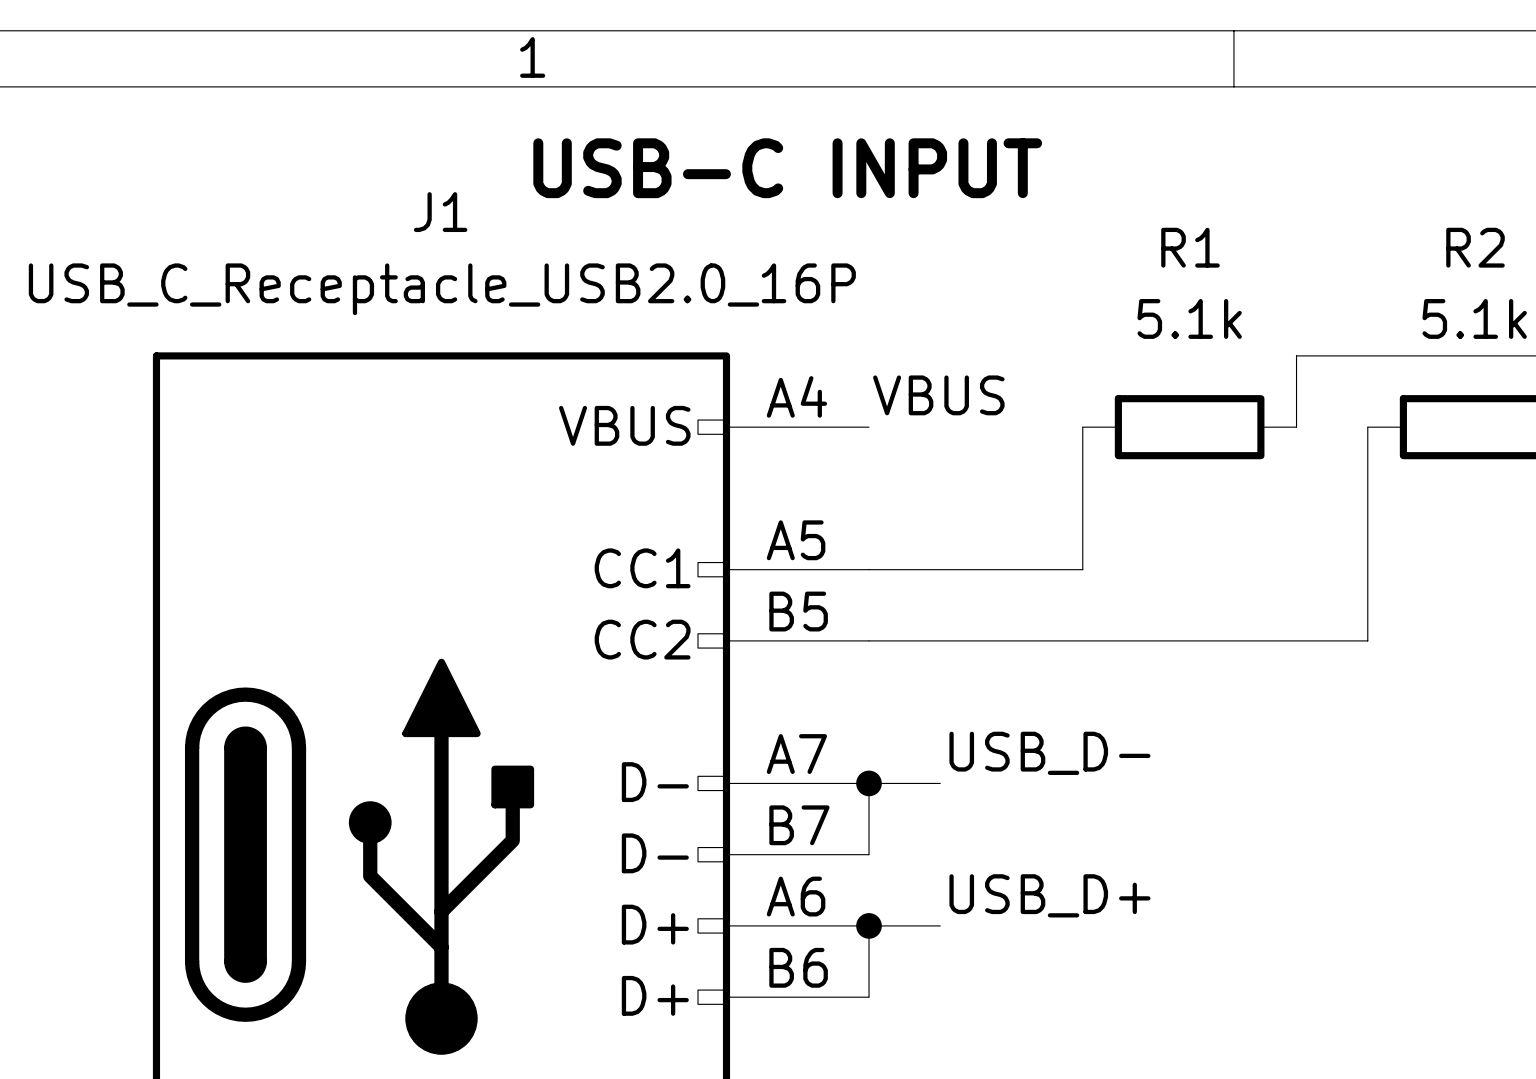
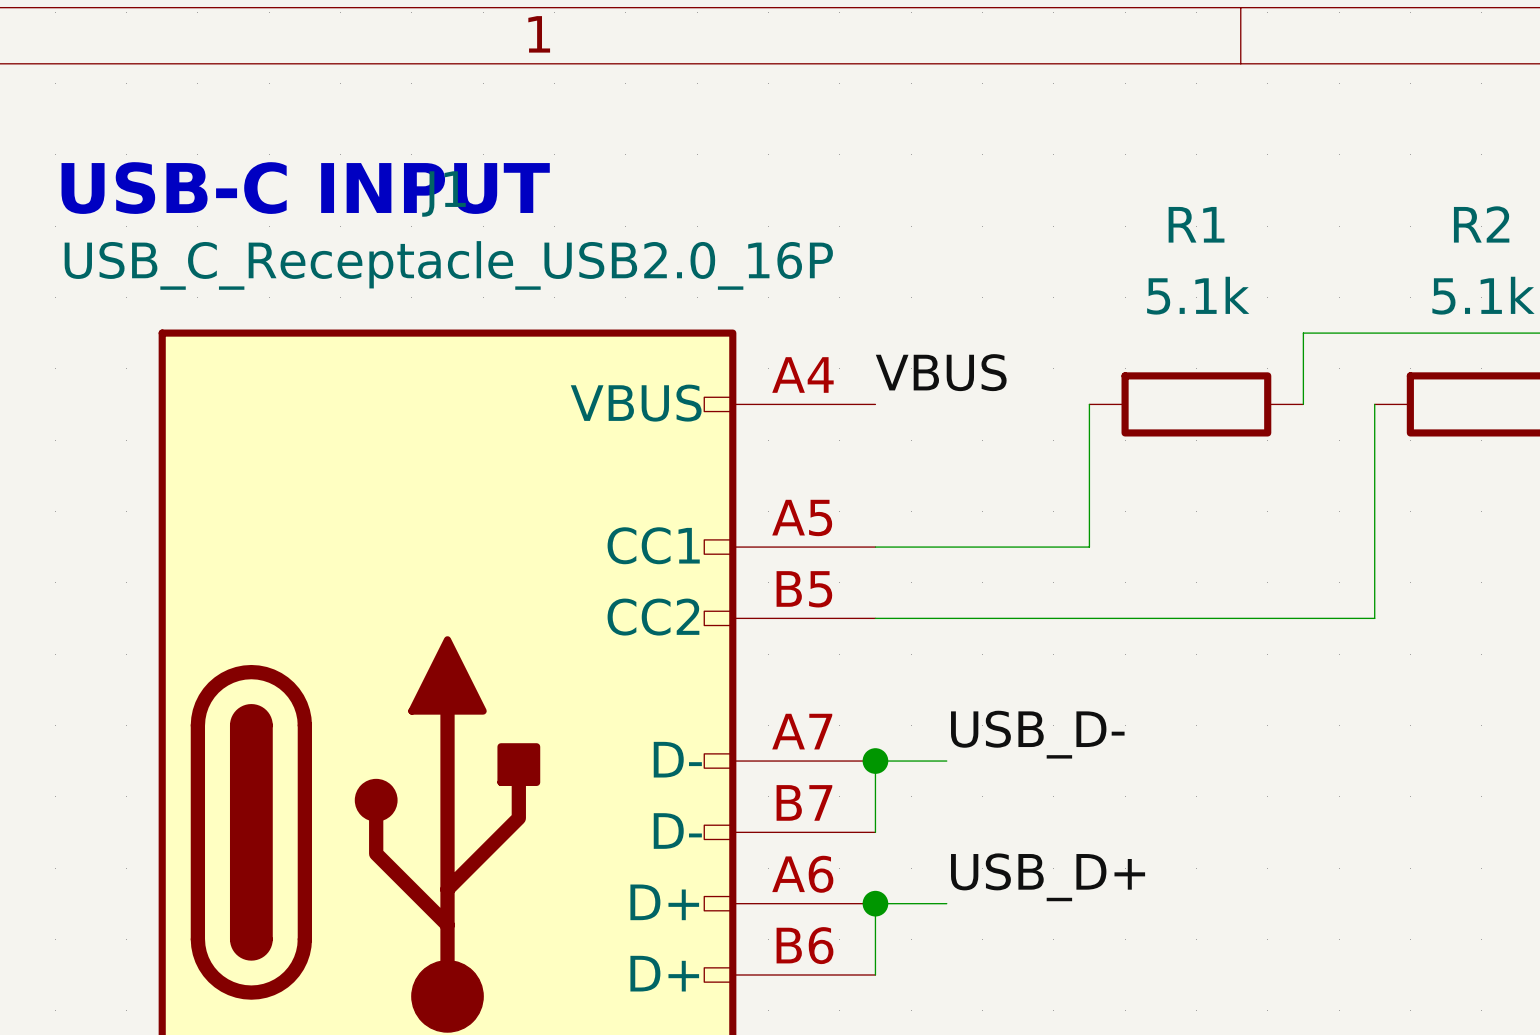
text position: USB-C INPUT (787, 168) -> USB-C INPUT (305, 188)

